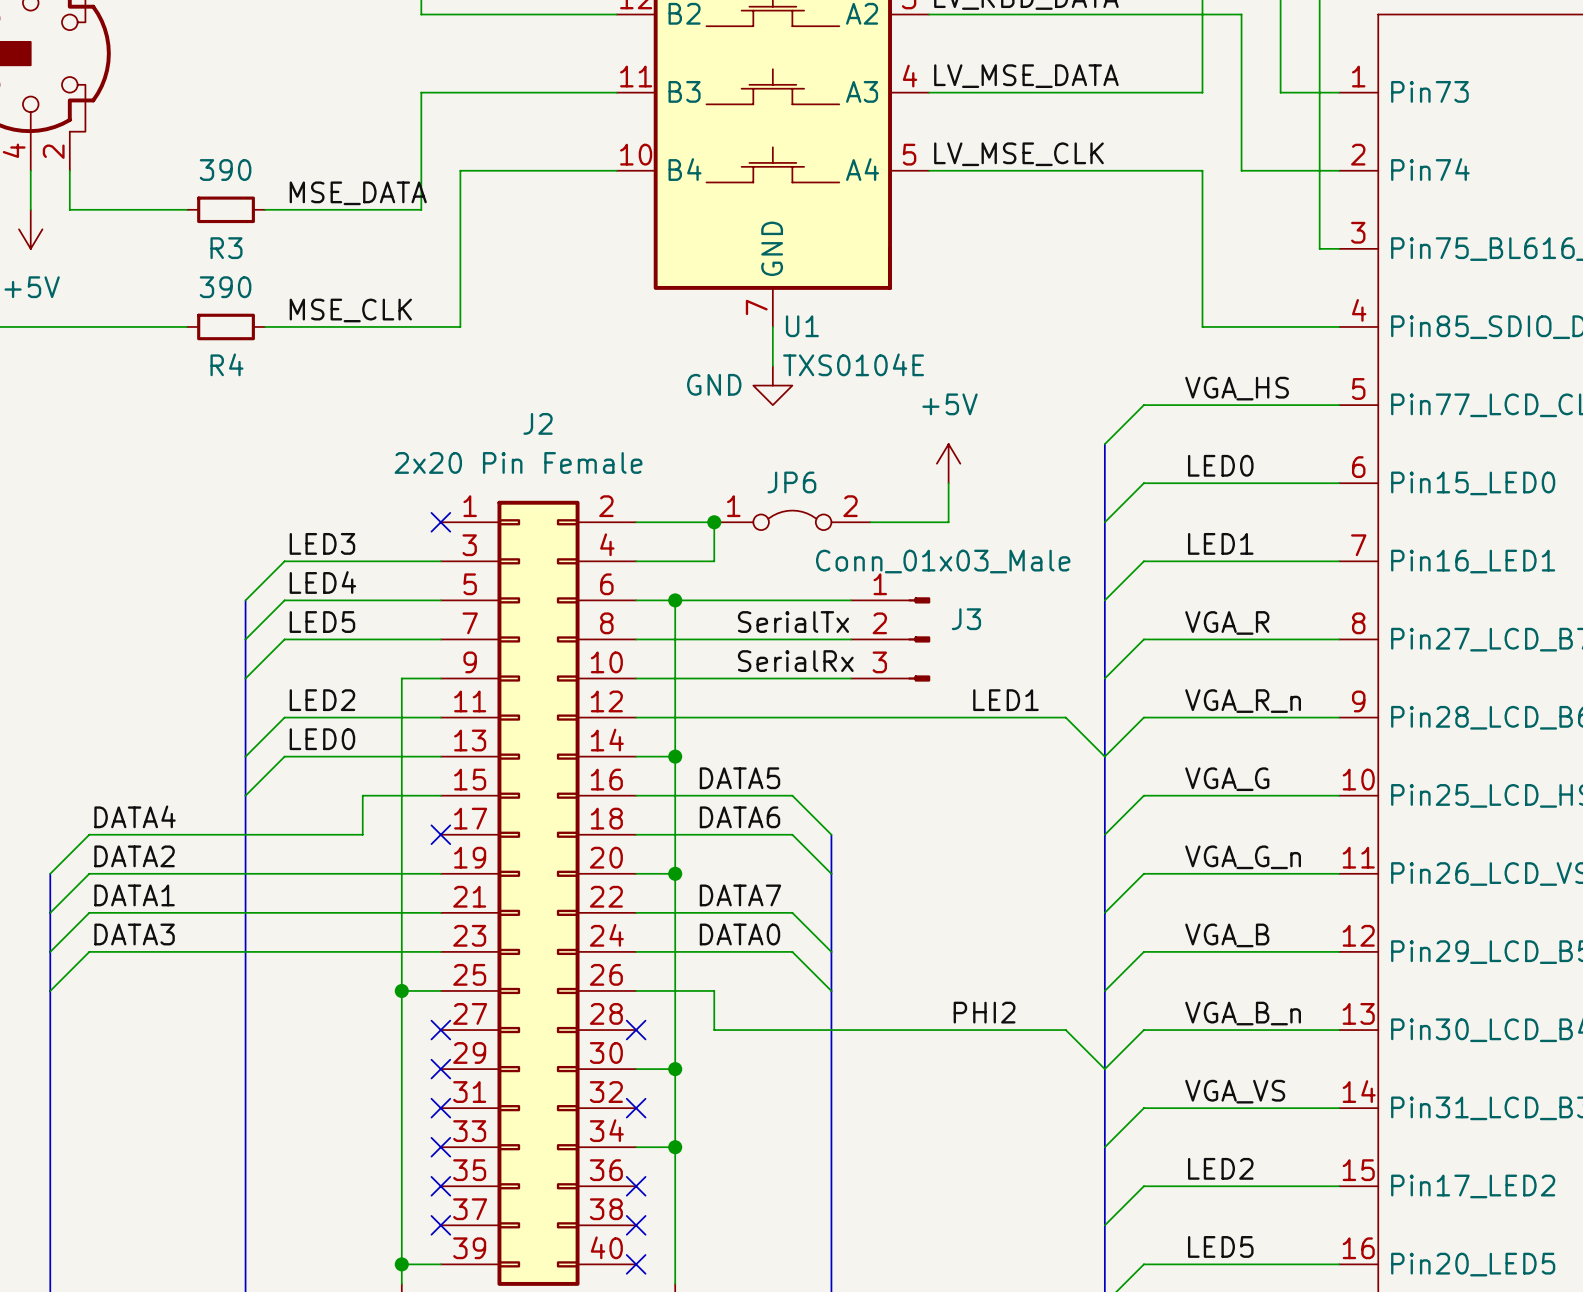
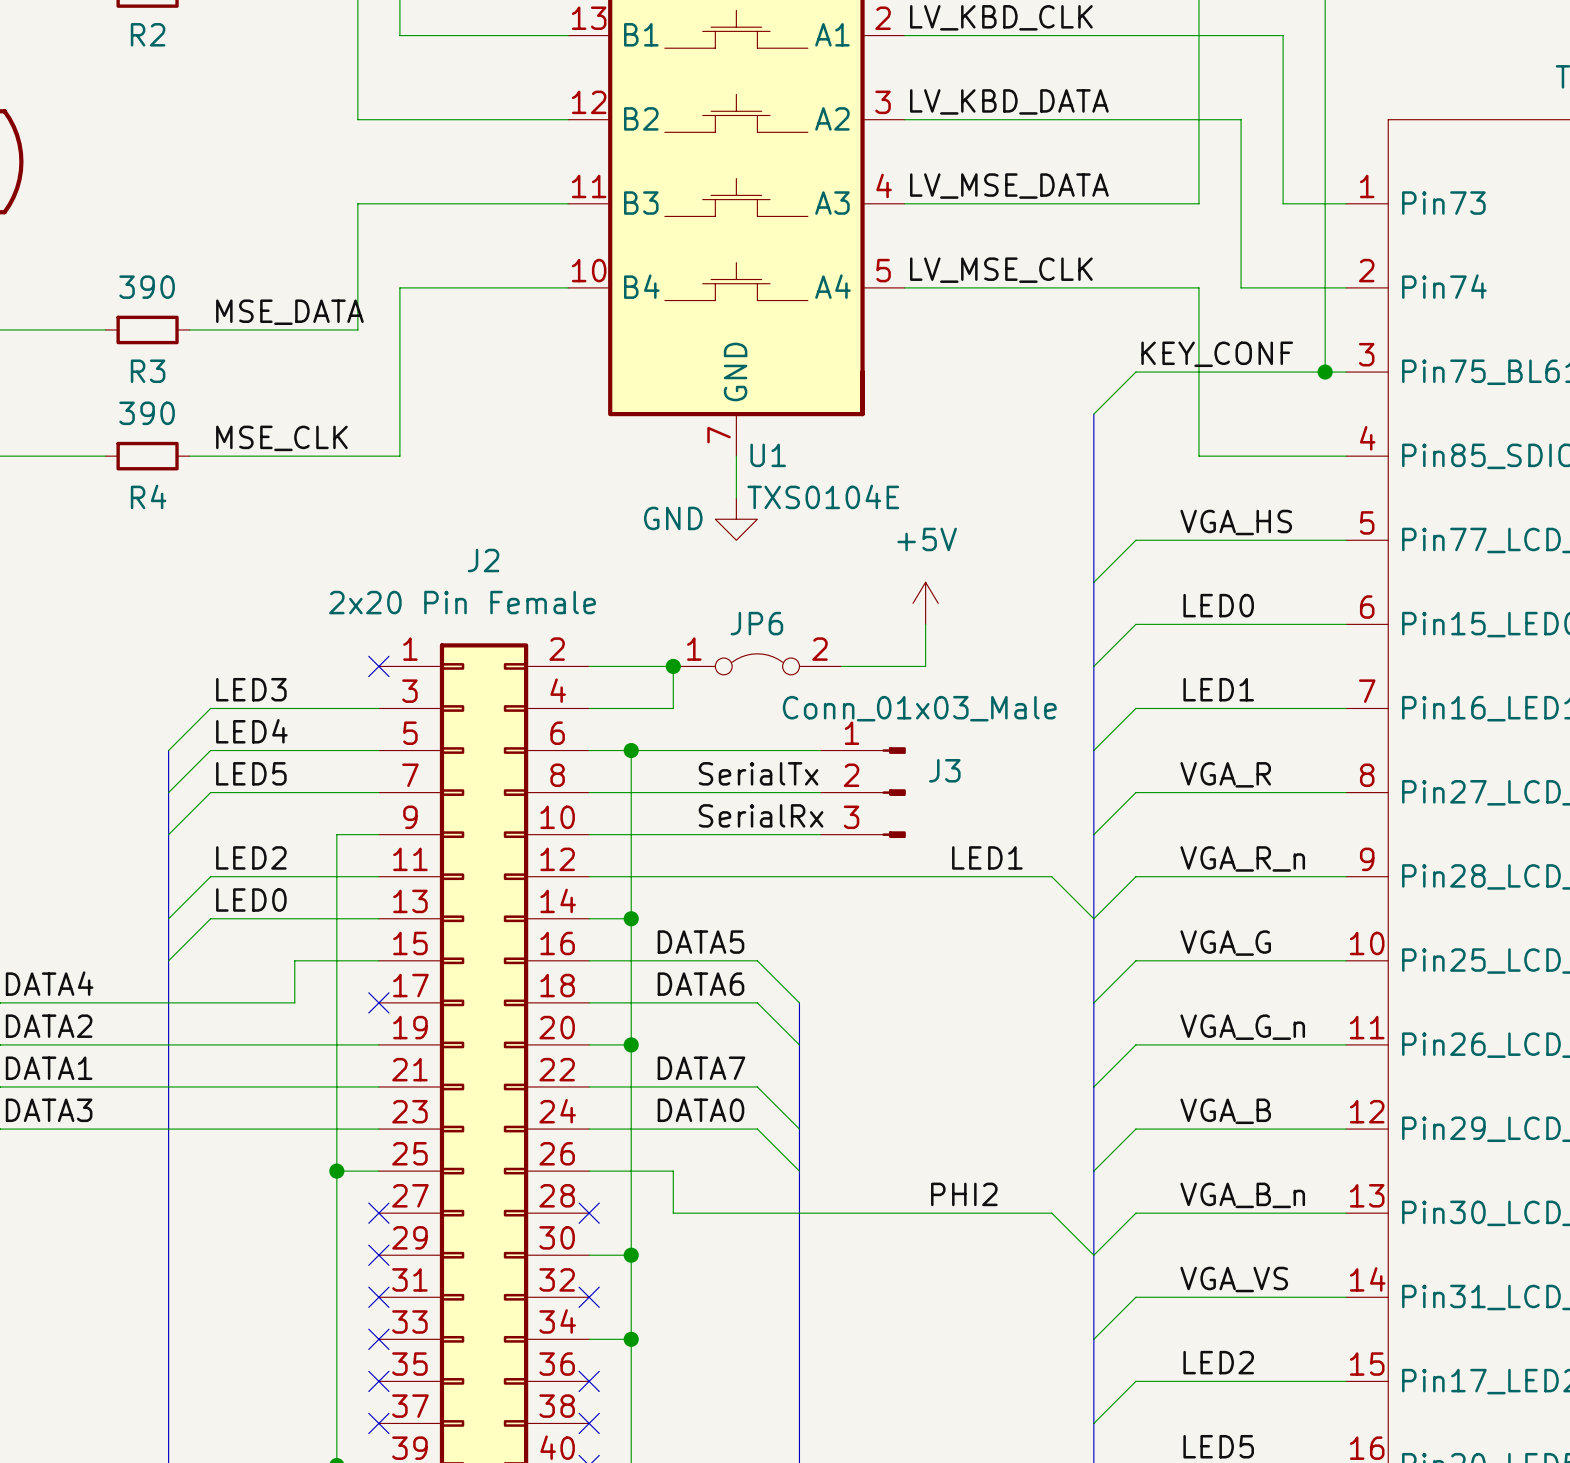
label: none -> KEY_CONF (1217, 354)
wire: none -> (1325, 372) (1135, 372) (1093, 414)
junction: none -> (1325, 372)
bus: none -> (1093, 414) (1093, 582)

